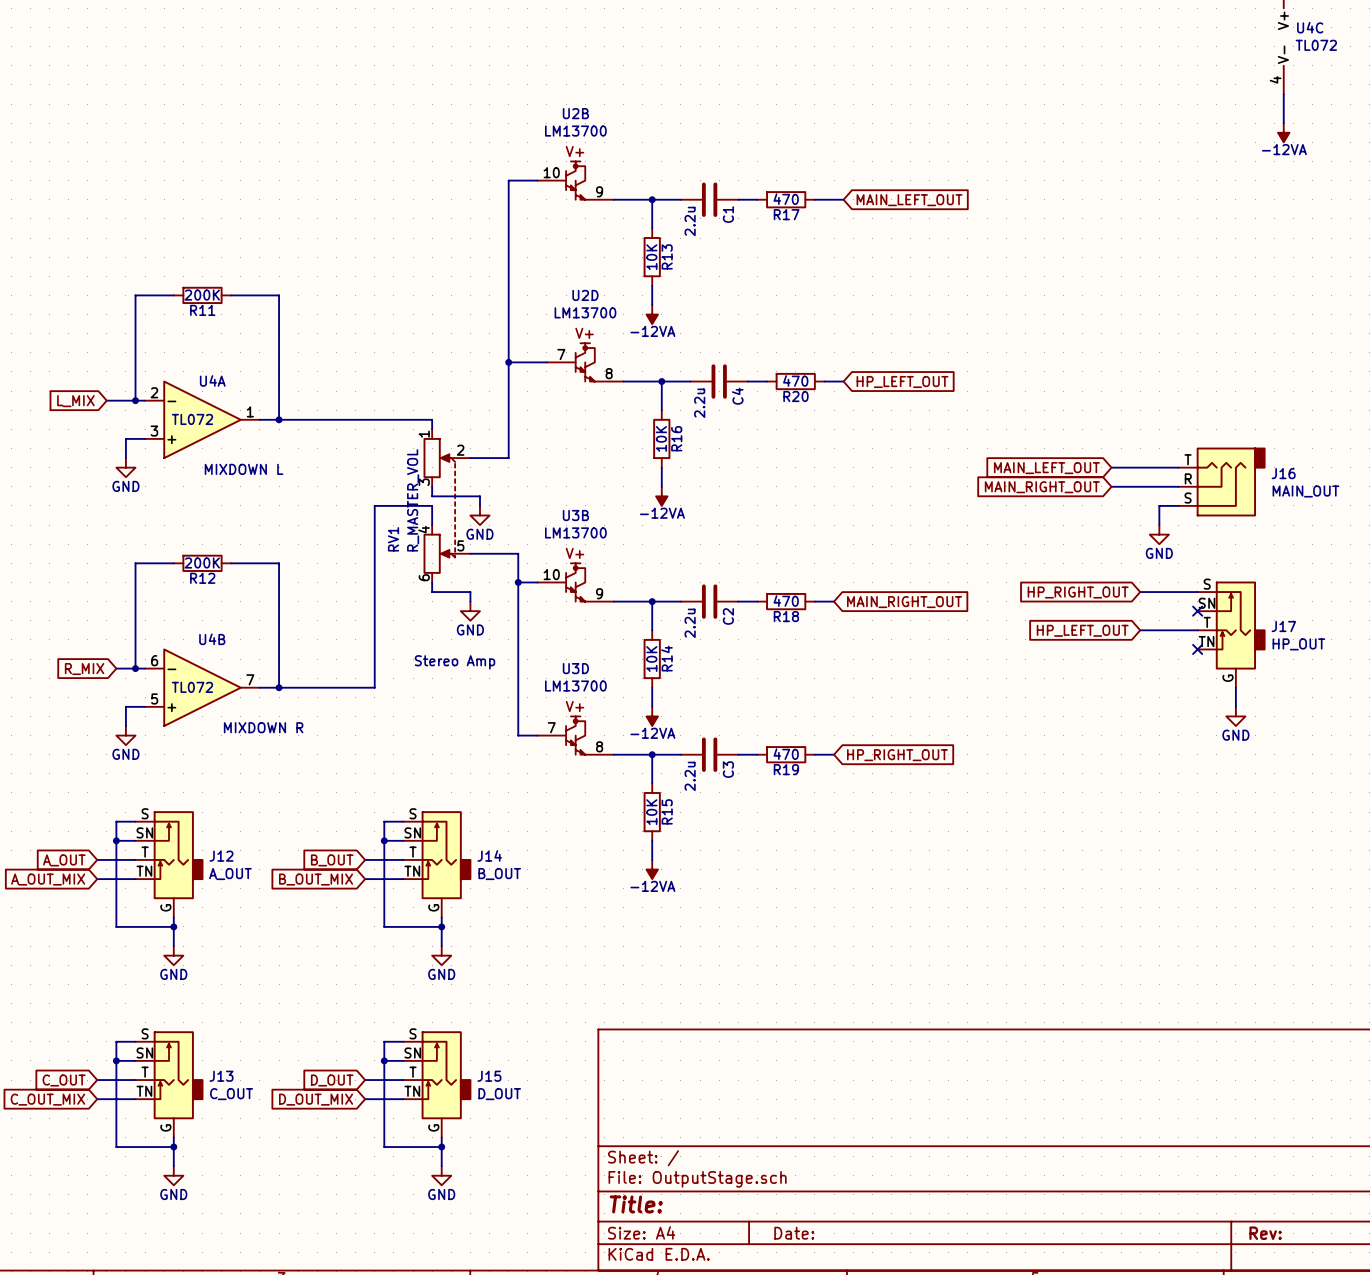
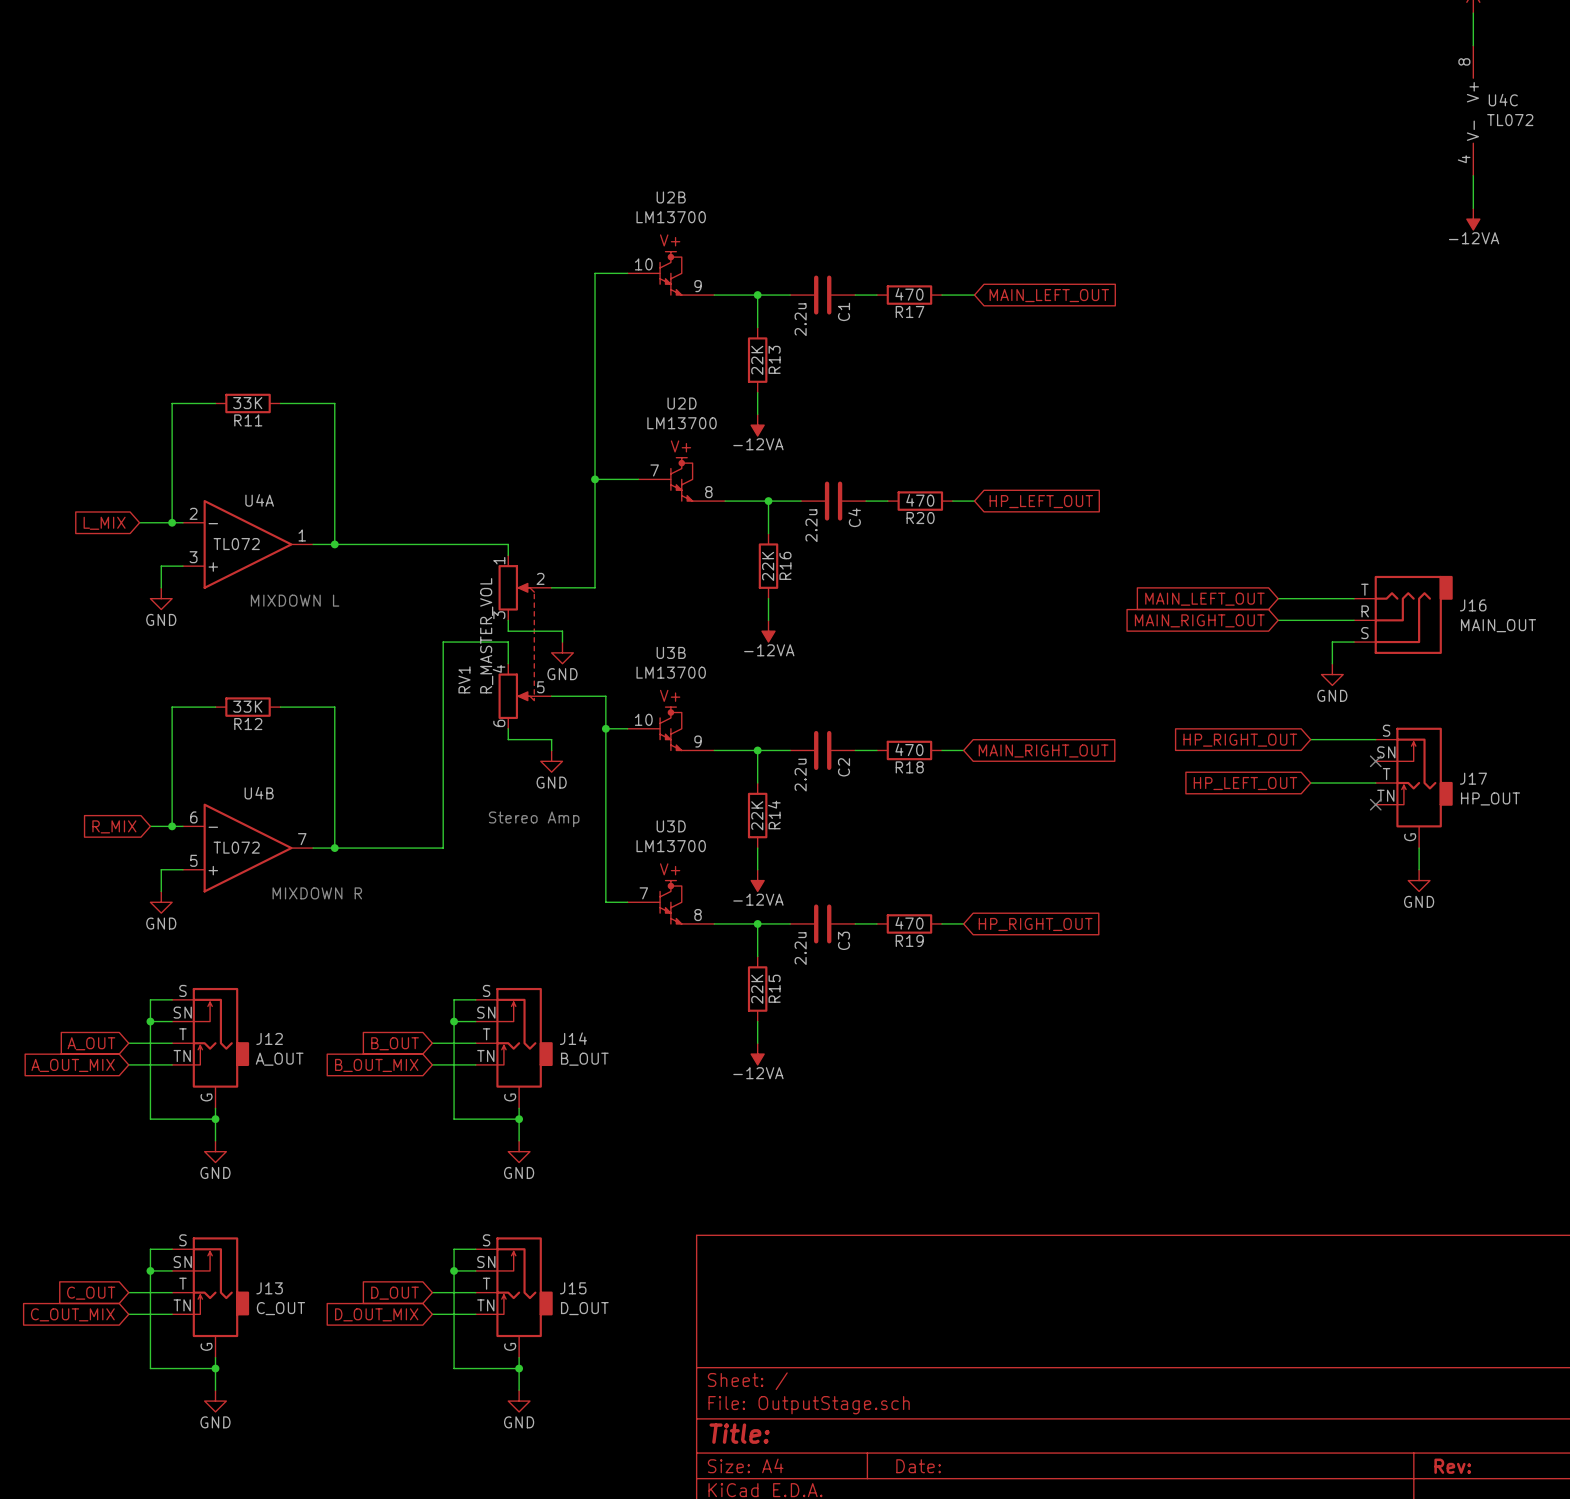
R13 value: 10K (651, 257) -> 22K (757, 360)
R11 value: 200K (202, 295) -> 33K (247, 403)
R16 value: 10K (661, 438) -> 22K (768, 566)
R12 value: 200K (202, 562) -> 33K (247, 706)
R14 value: 10K (651, 659) -> 22K (757, 815)
R15 value: 10K (651, 812) -> 22K (757, 989)

